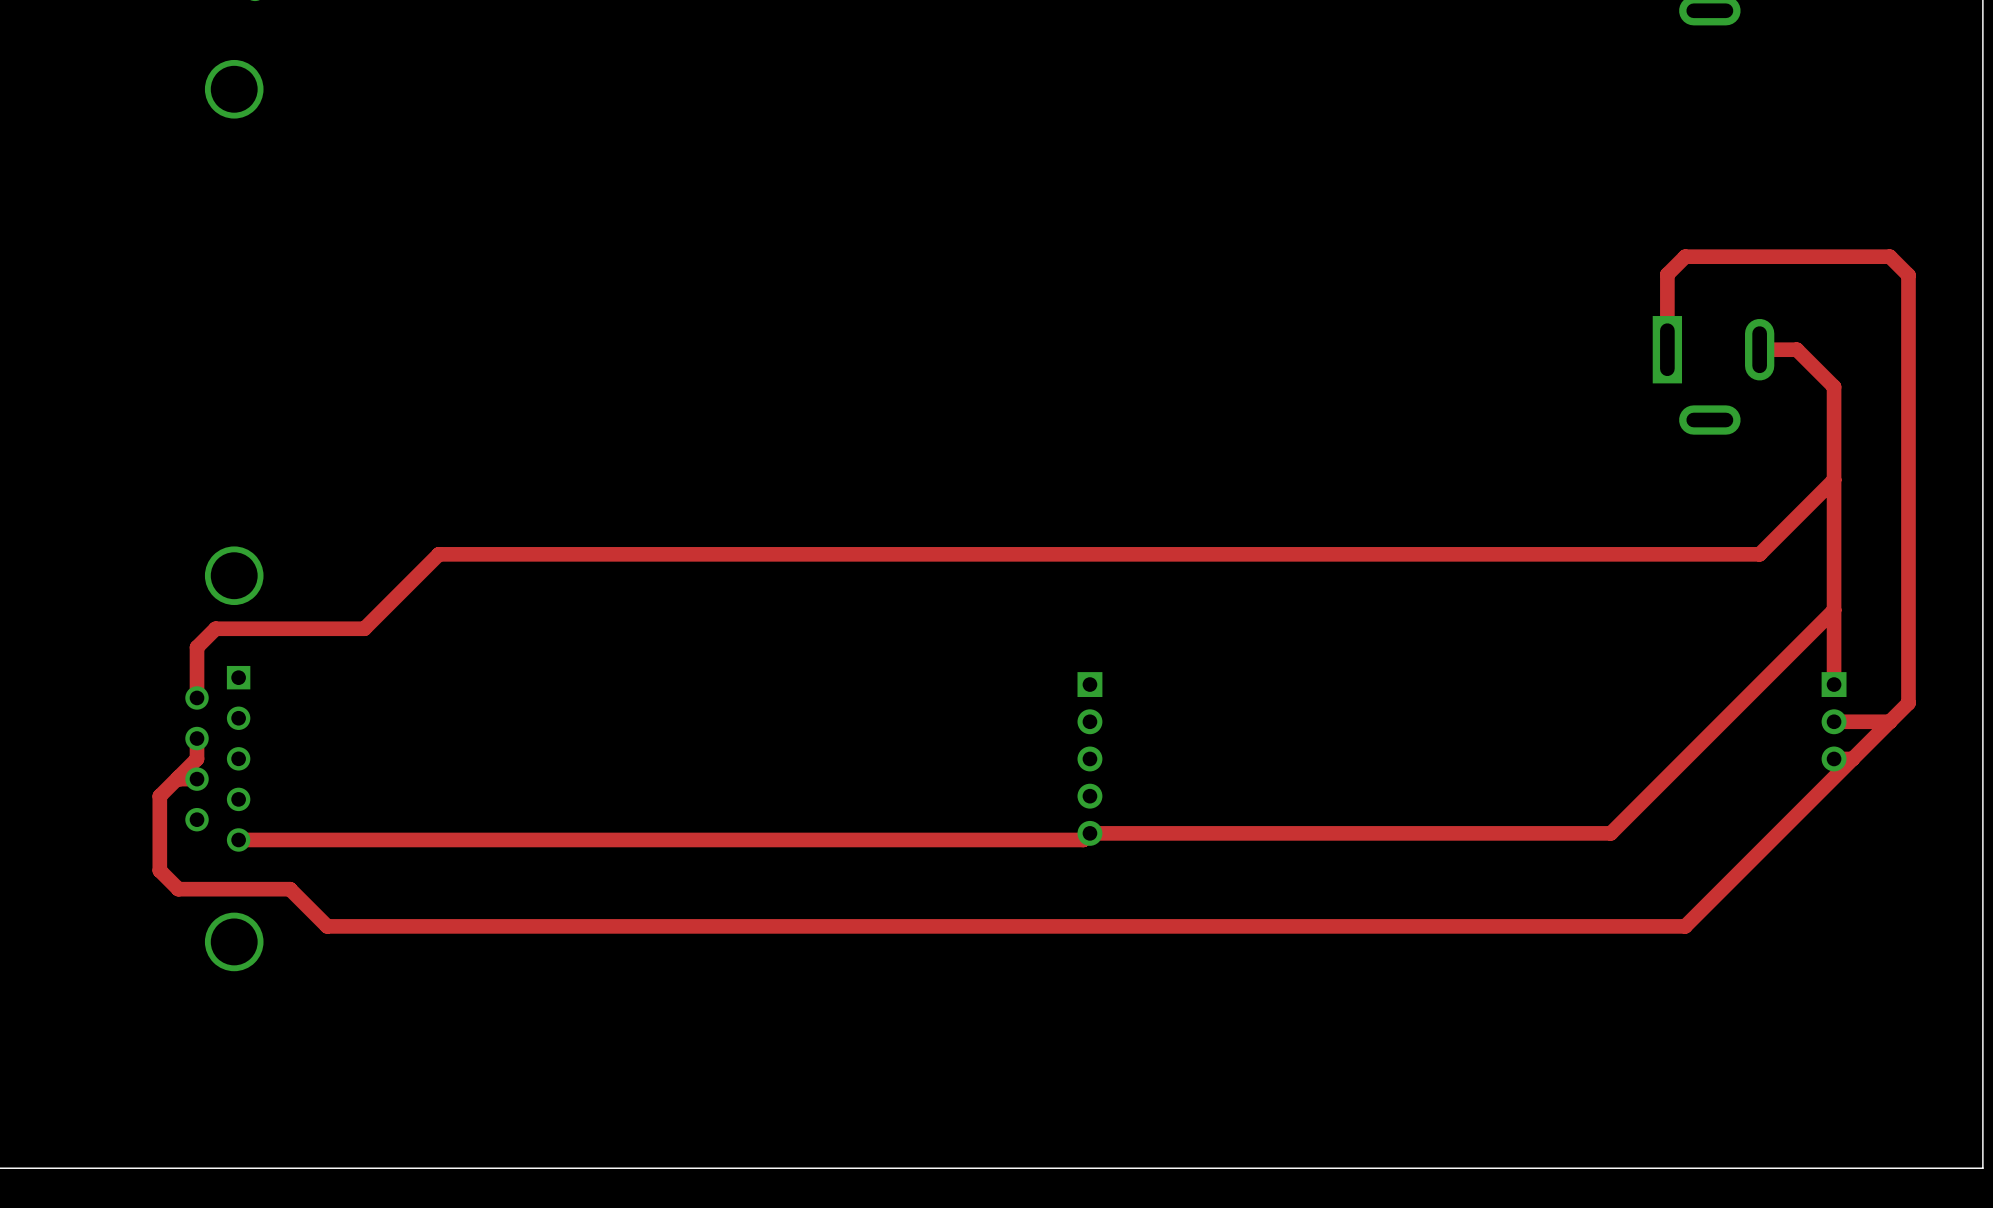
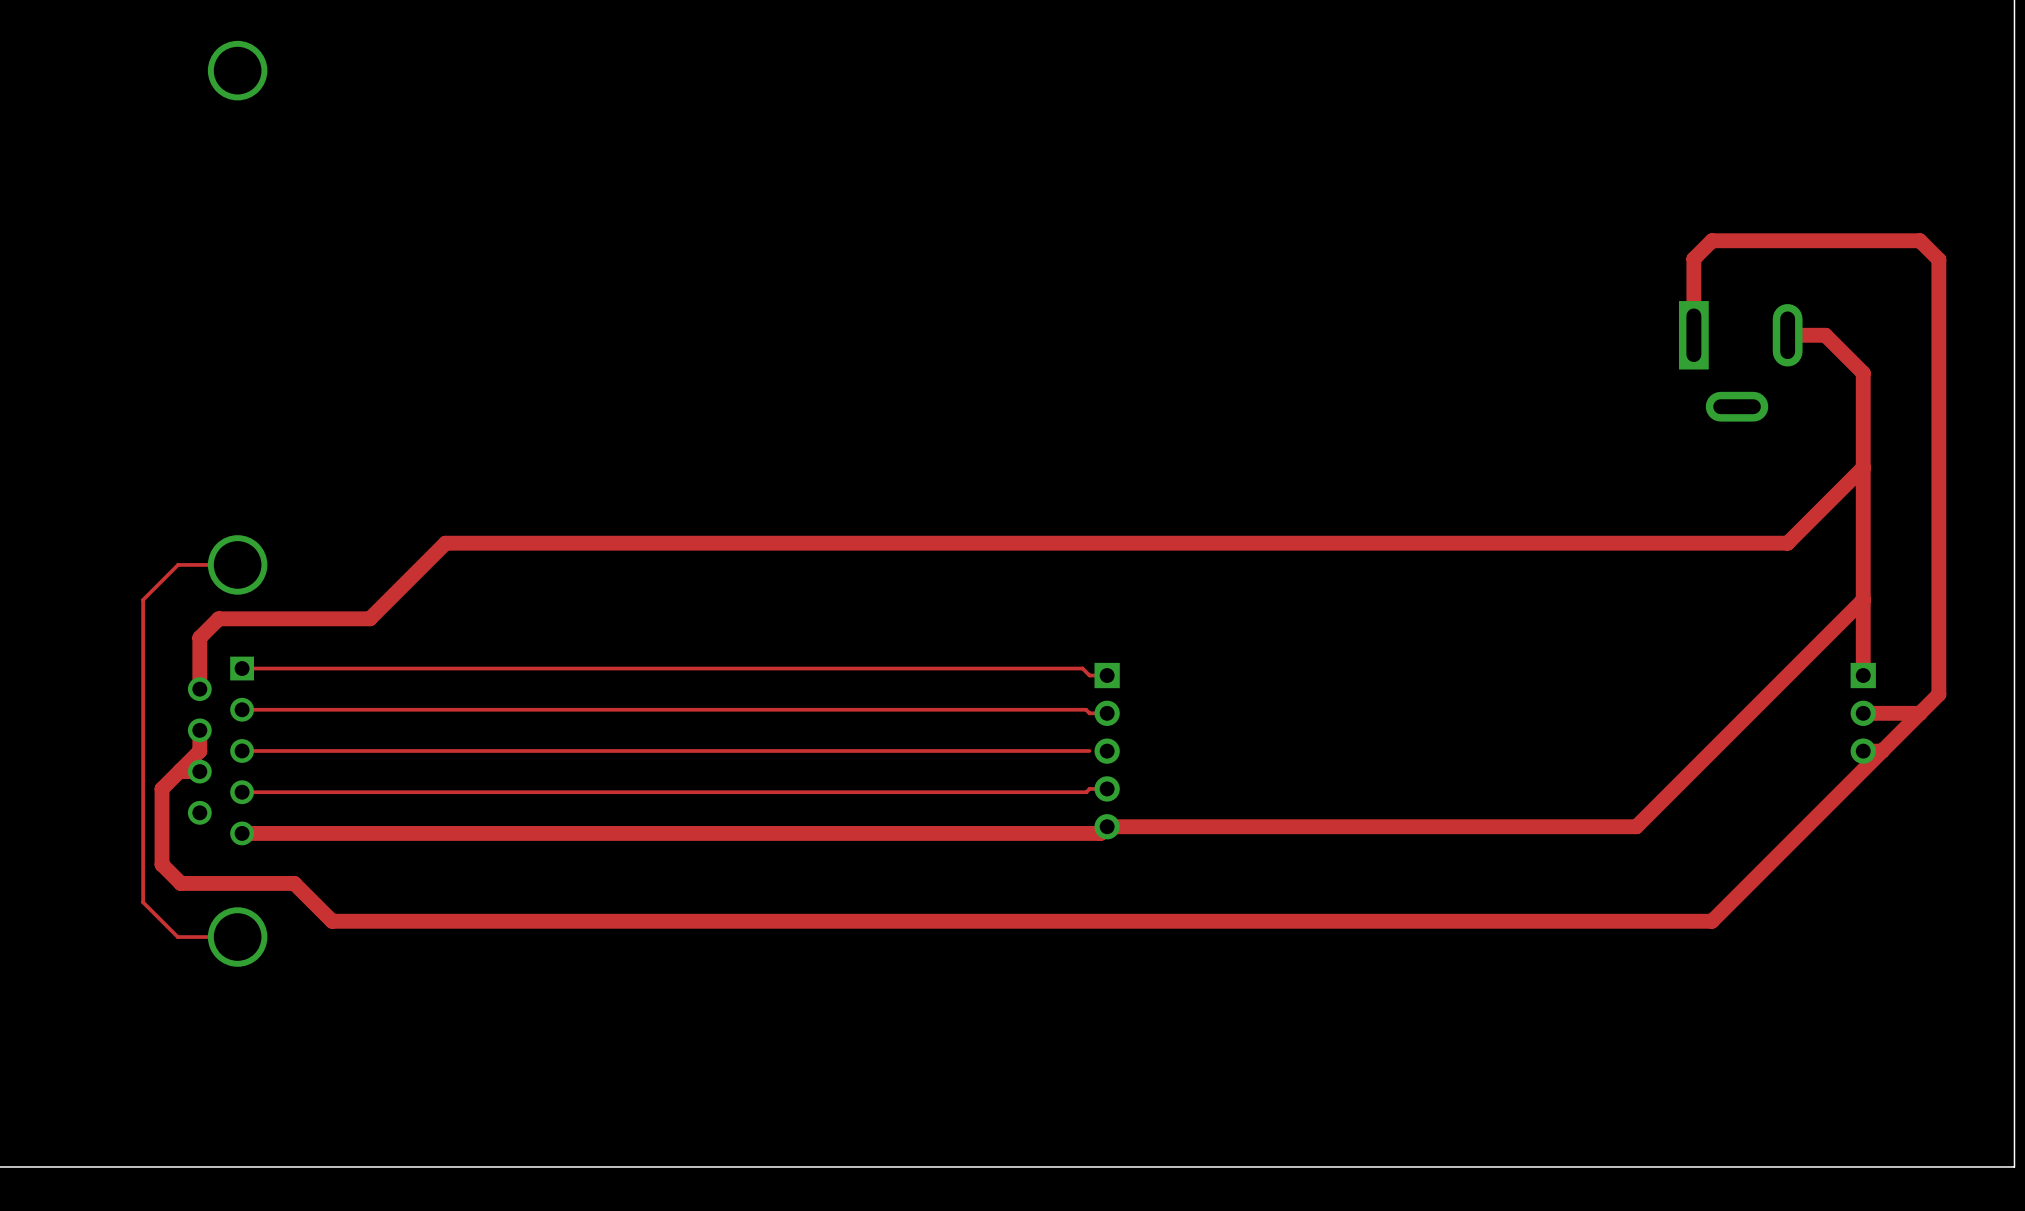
top track: none -> (237, 564) (178, 564) (143, 599) (143, 902) (177, 937) (237, 937)
top track: none -> (242, 668) (1082, 668) (1089, 675) (1107, 675)
top track: none -> (242, 709) (1086, 709) (1089, 713) (1107, 713)
top track: none -> (1089, 750) (242, 750)
top track: none -> (1107, 788) (1089, 788) (1086, 792) (242, 792)

